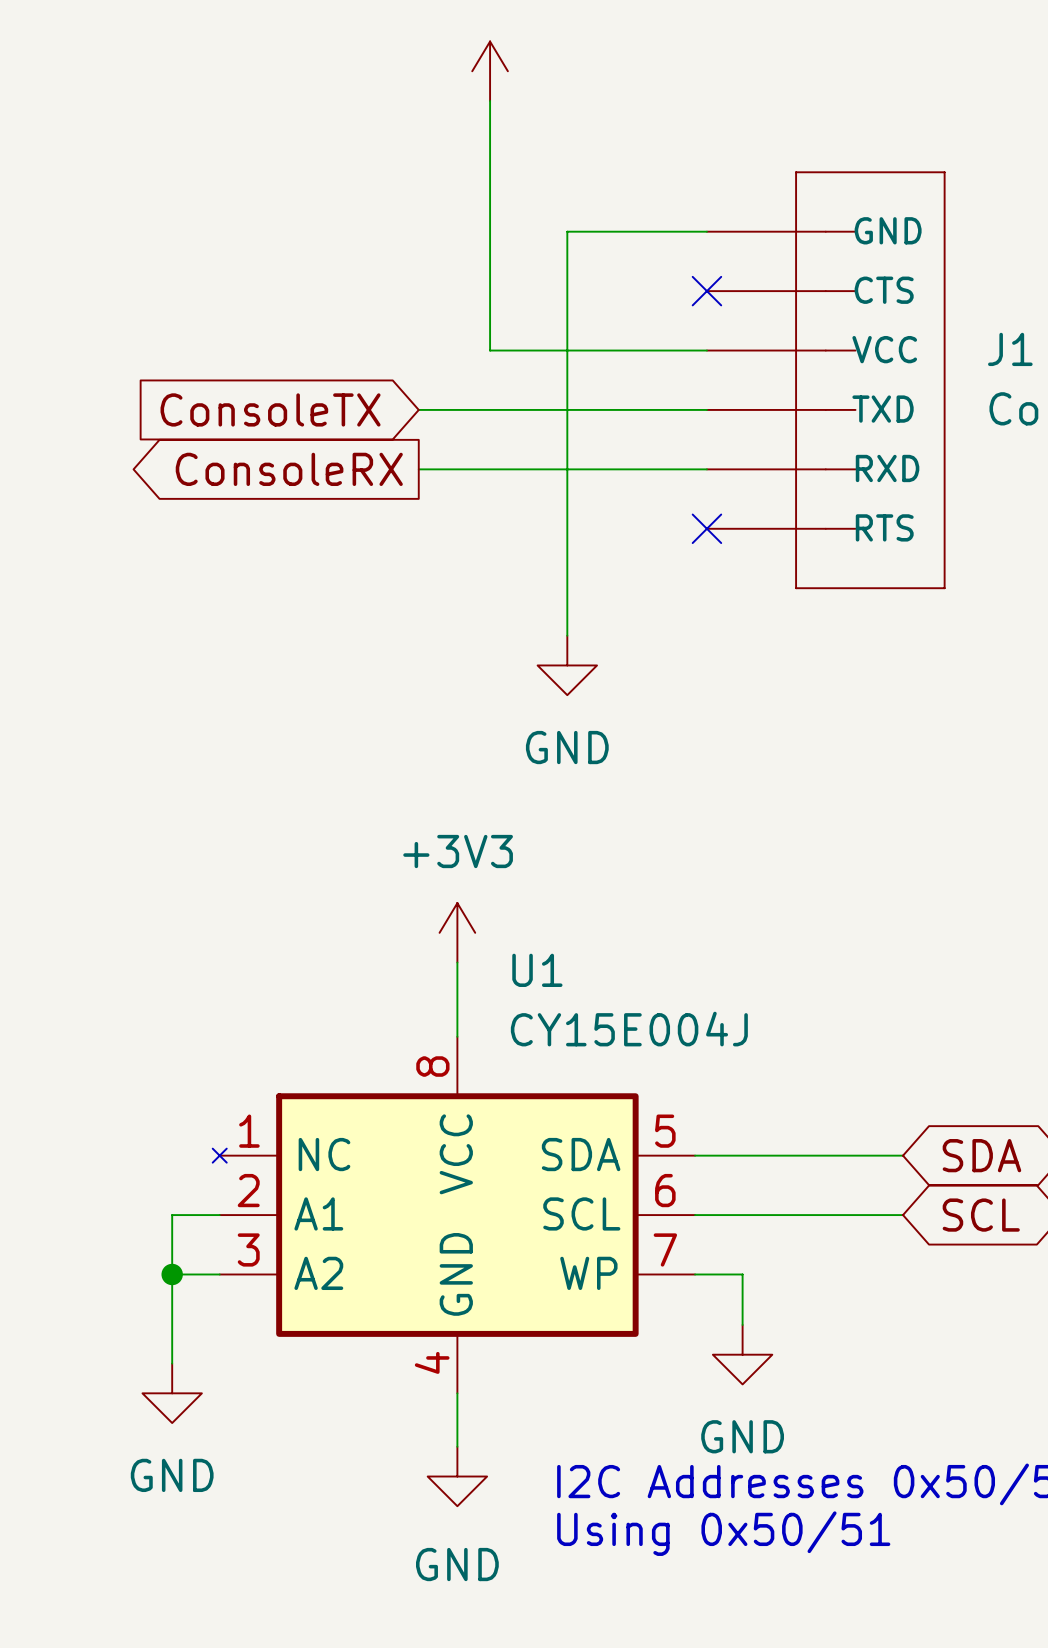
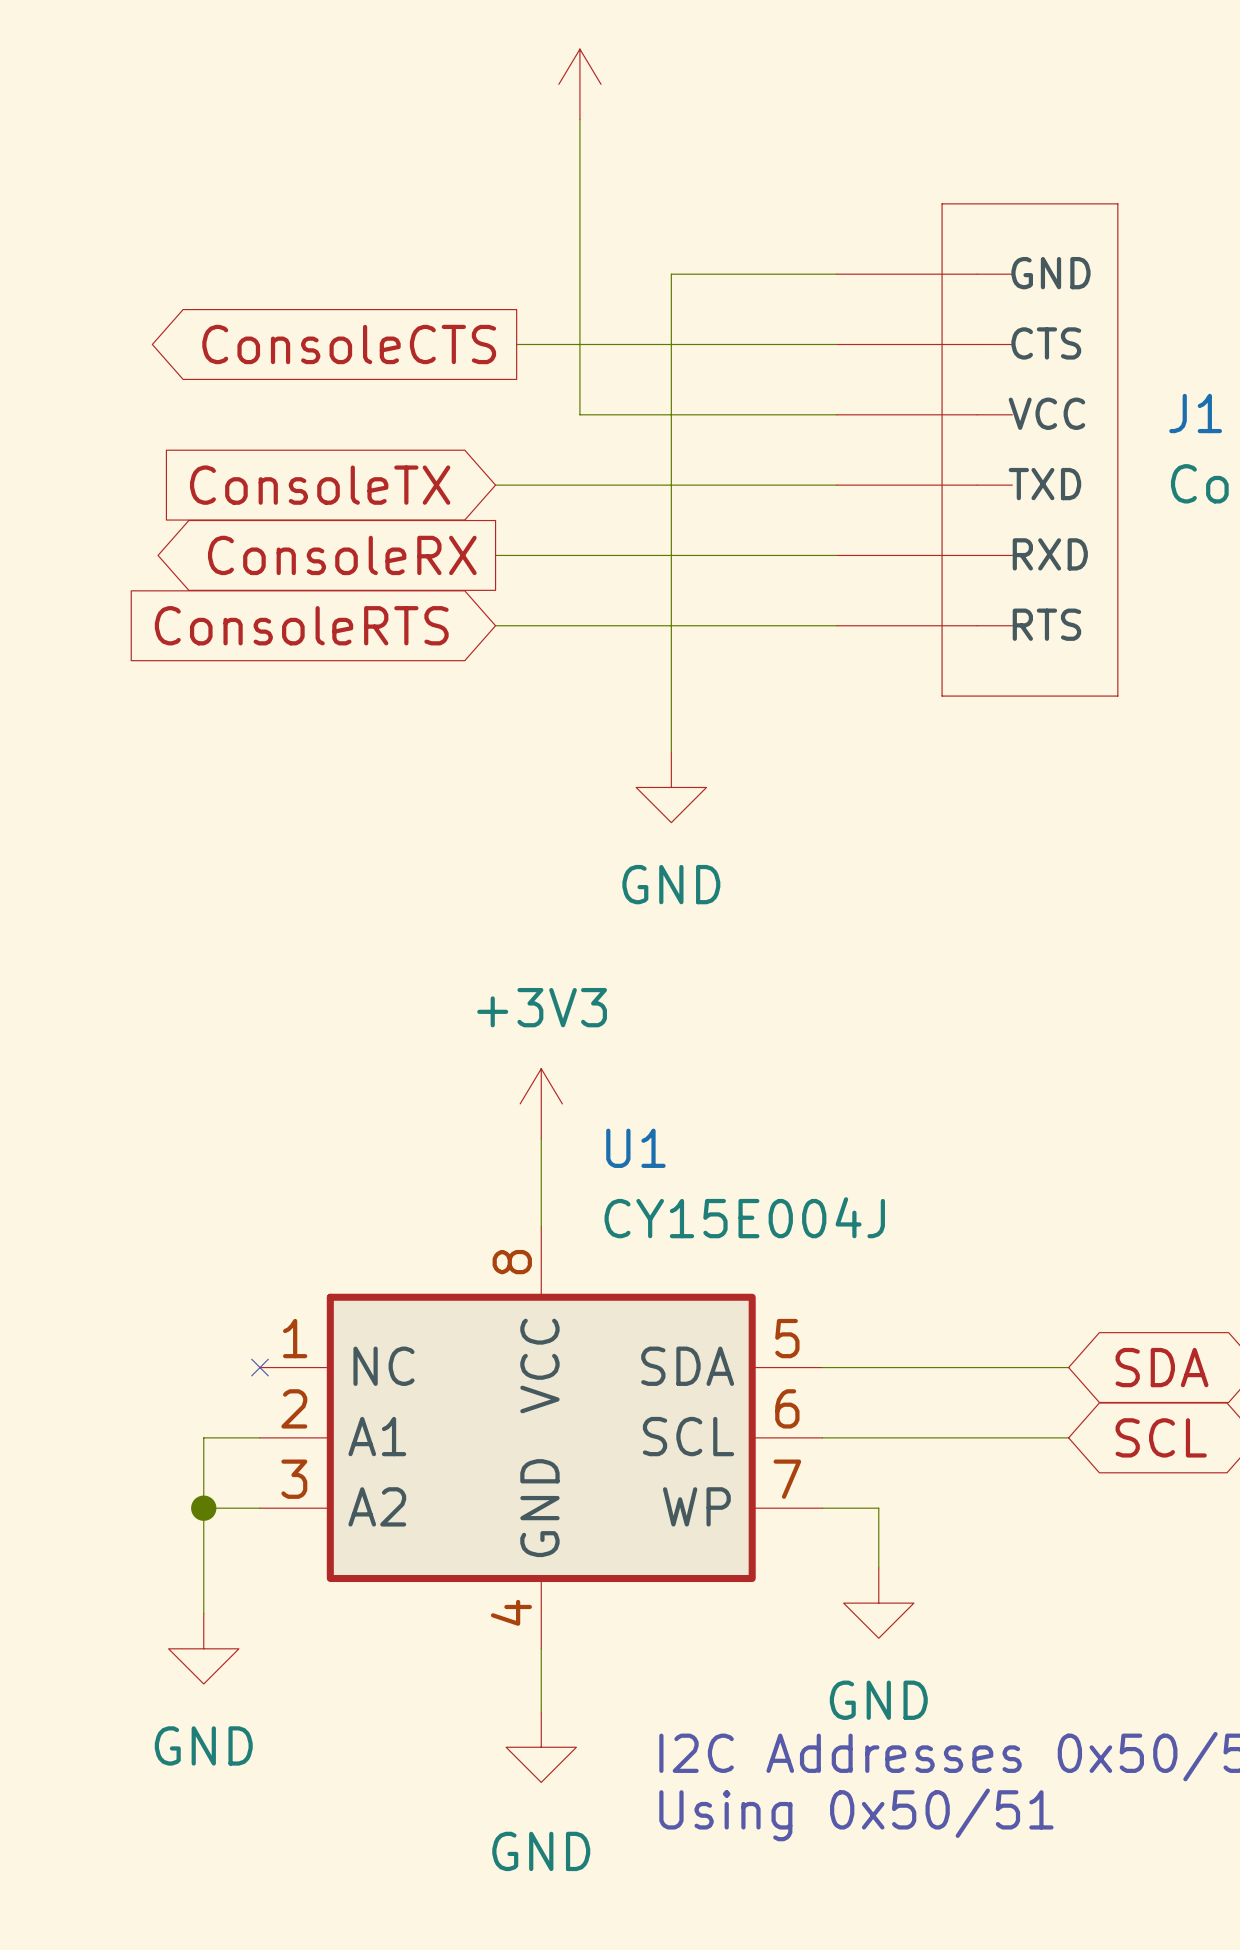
global label: none -> ConsoleCTS (349, 344)
wire: none -> (516, 344) (836, 344)
no-connect mark: (706, 291) -> none
global label: none -> ConsoleRTS (301, 625)
wire: none -> (495, 625) (836, 625)
no-connect mark: (706, 528) -> none

